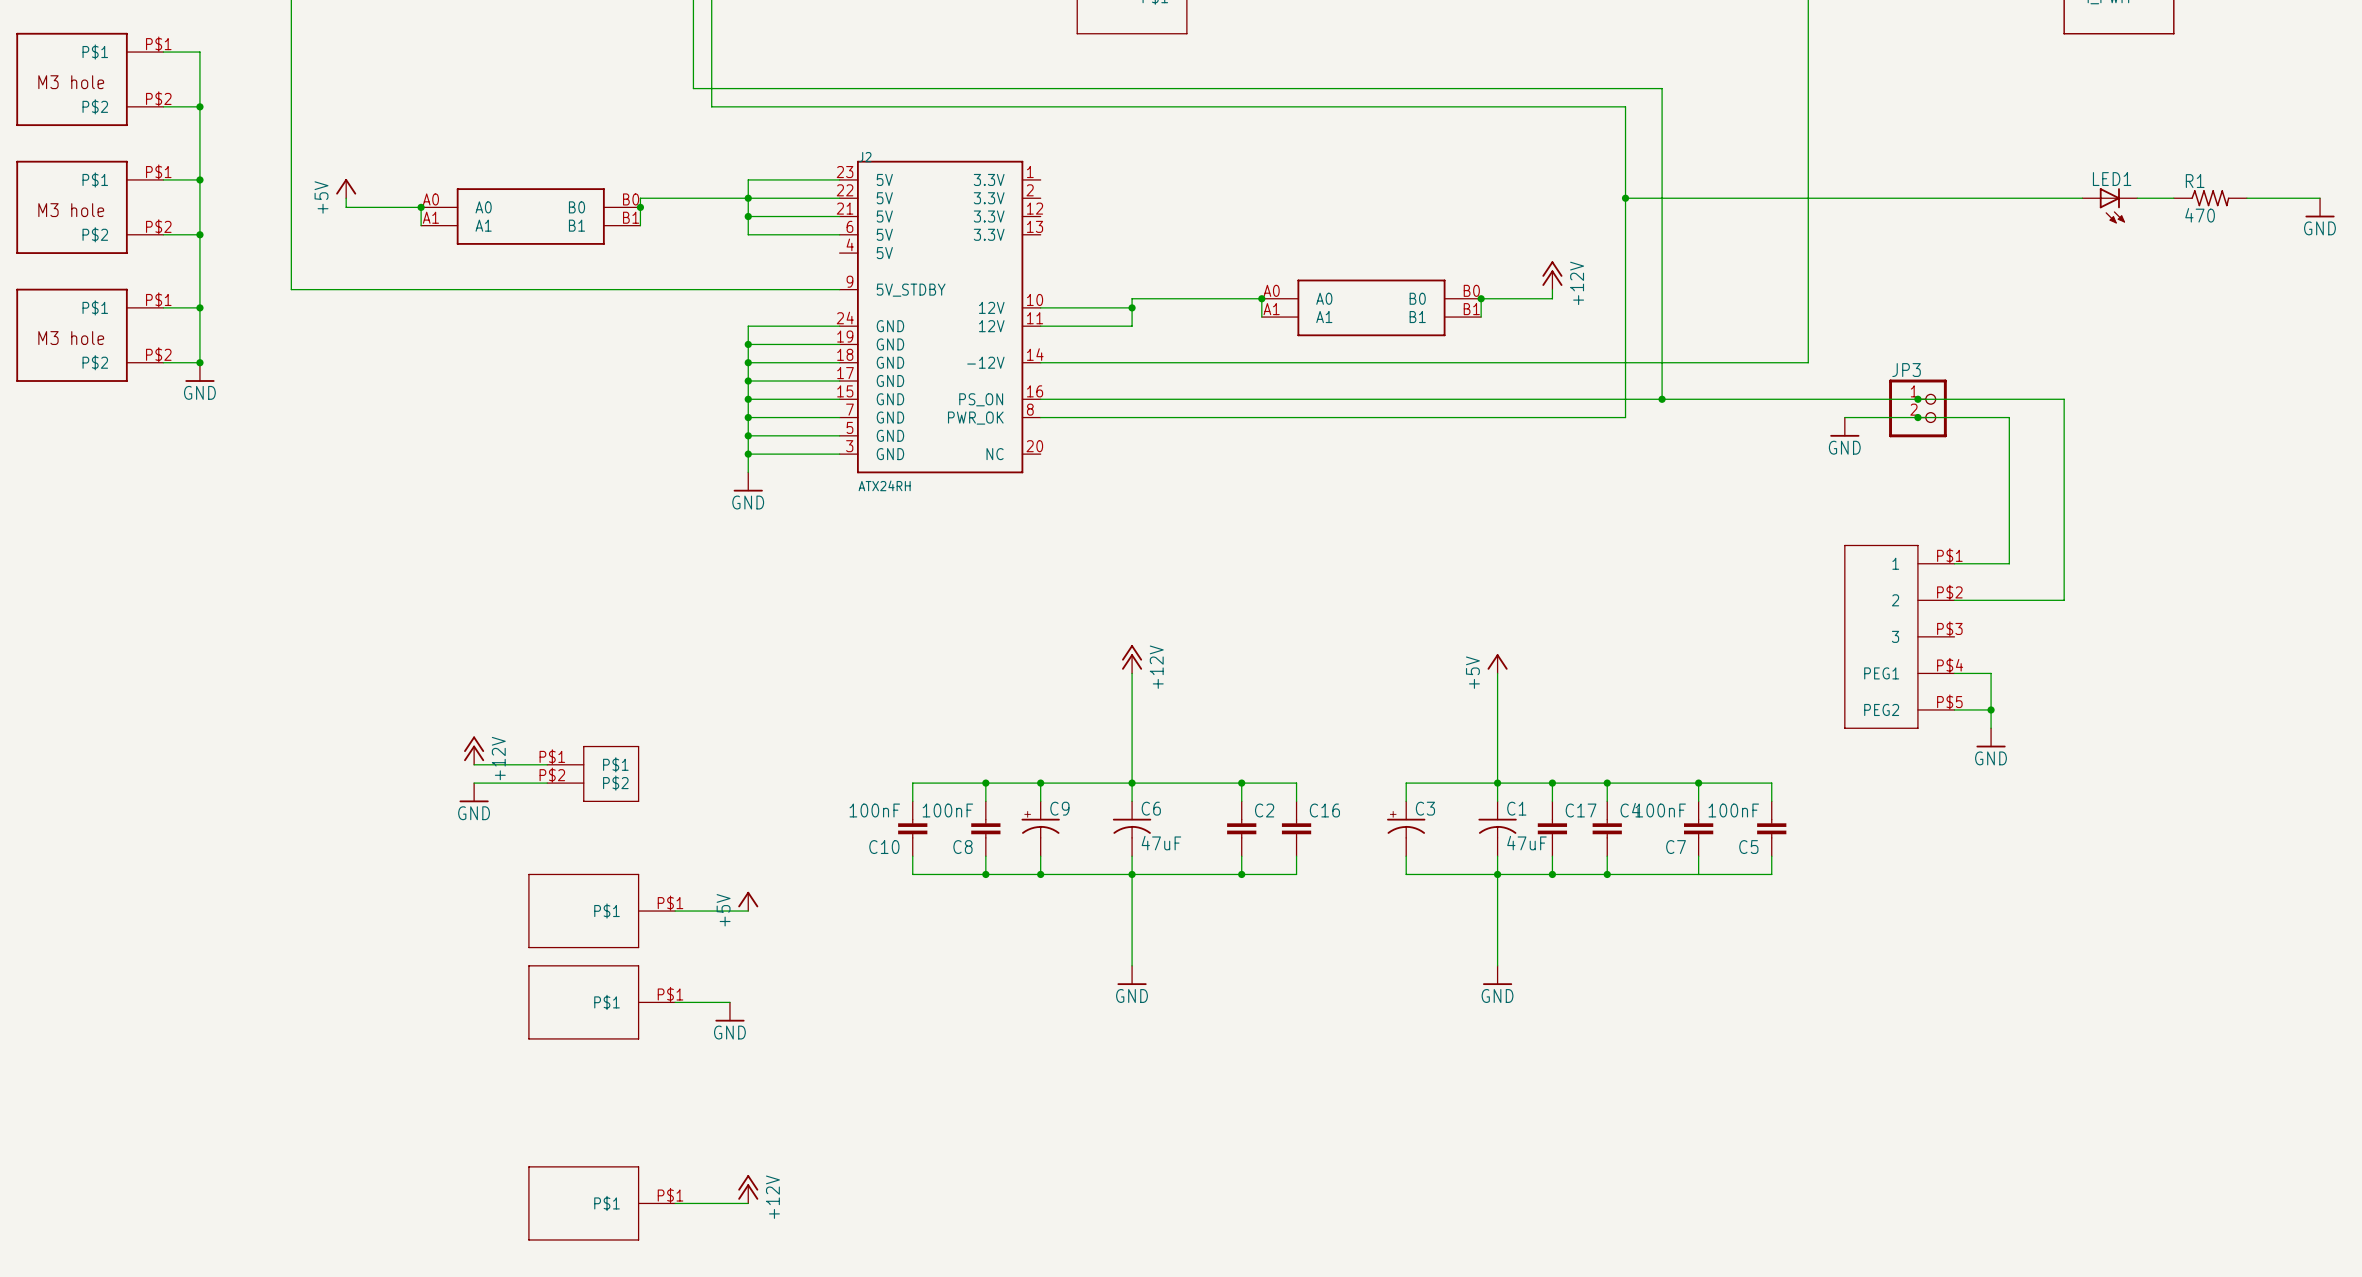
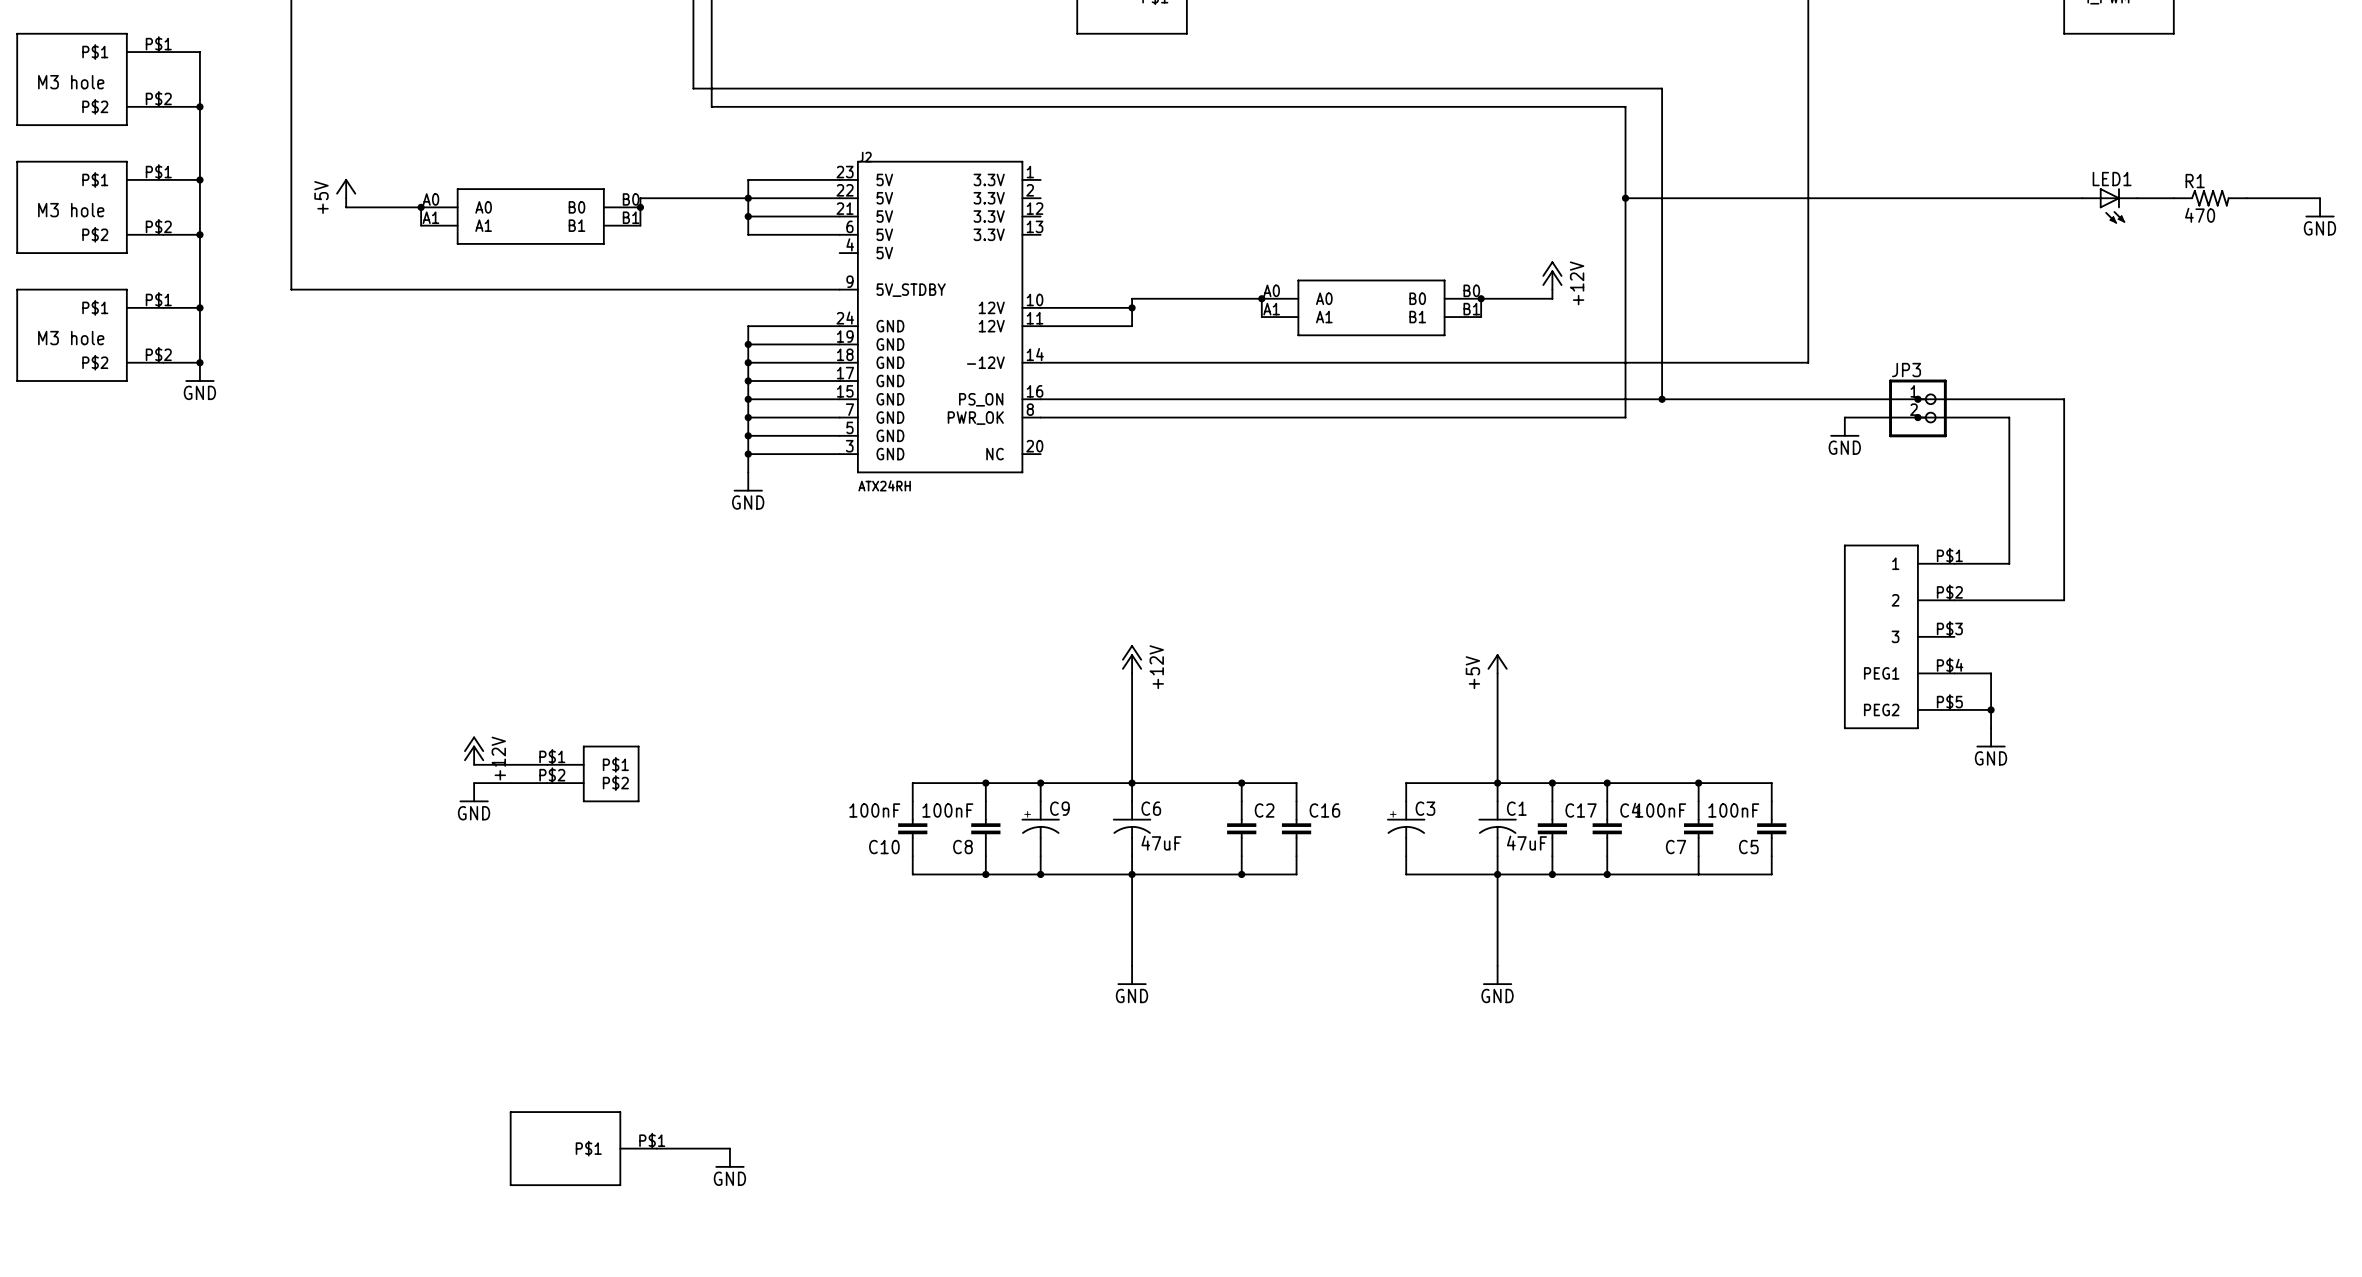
power symbol: +5V (748, 901) -> none
part: (601, 911) -> none
wire: (675, 911) (748, 911) -> none
part: (601, 1002) -> none
wire: (675, 1002) (729, 1002) -> none
power symbol position: GND (729, 1011) -> GND (729, 1158)
power symbol: +12V (748, 1189) -> none
part position: (601, 1203) -> (583, 1148)
wire: (675, 1203) (748, 1203) -> (656, 1148) (729, 1148)

